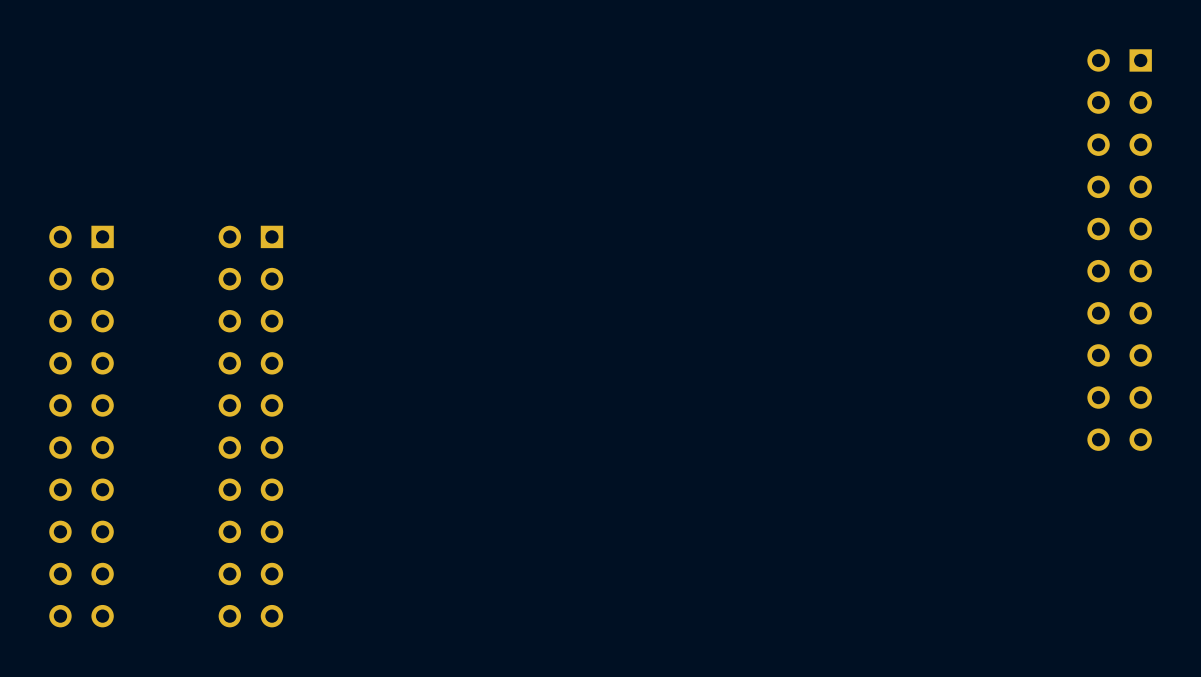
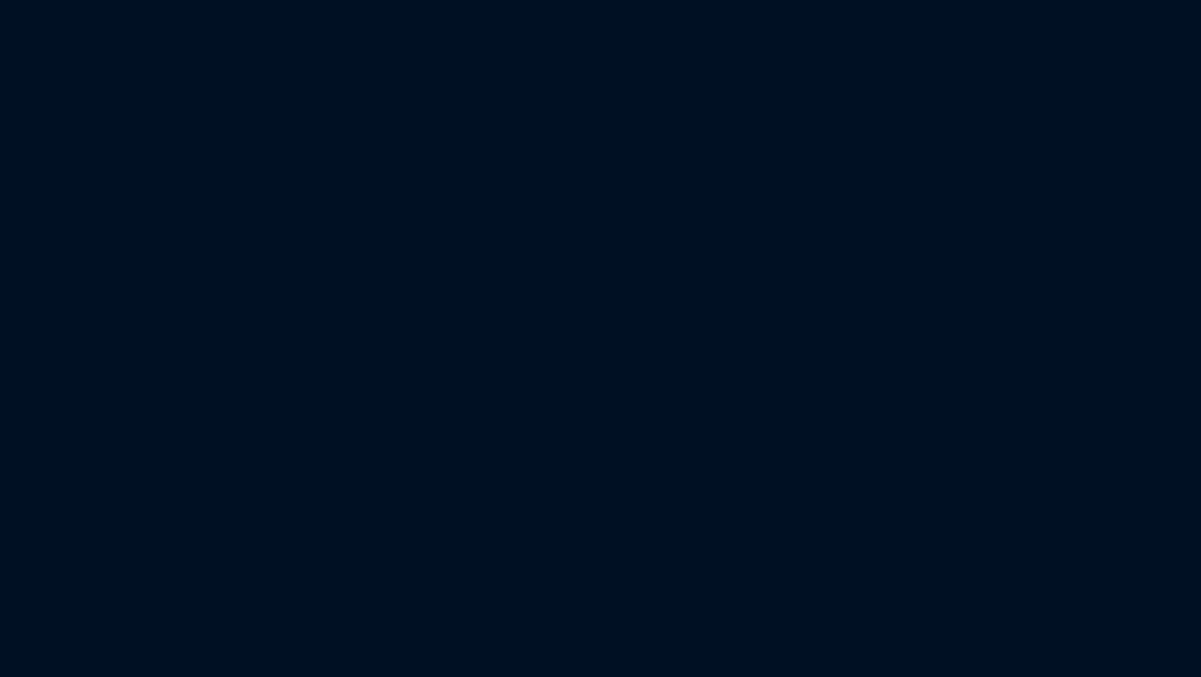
part: (1119, 250) -> none
part: (81, 426) -> none
part: (250, 426) -> none

